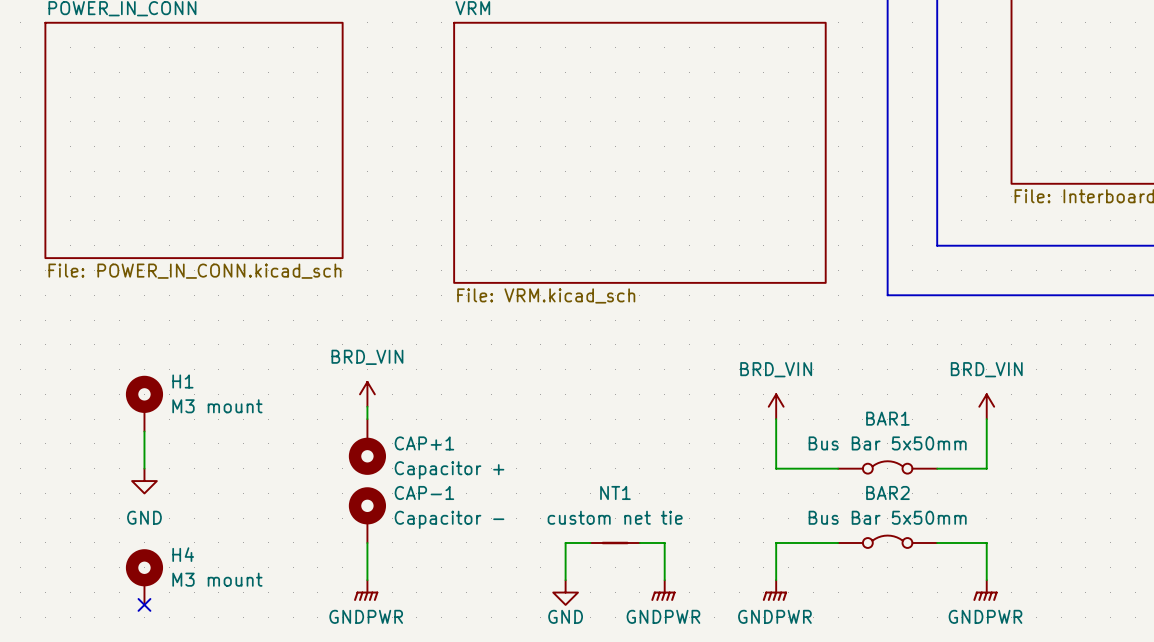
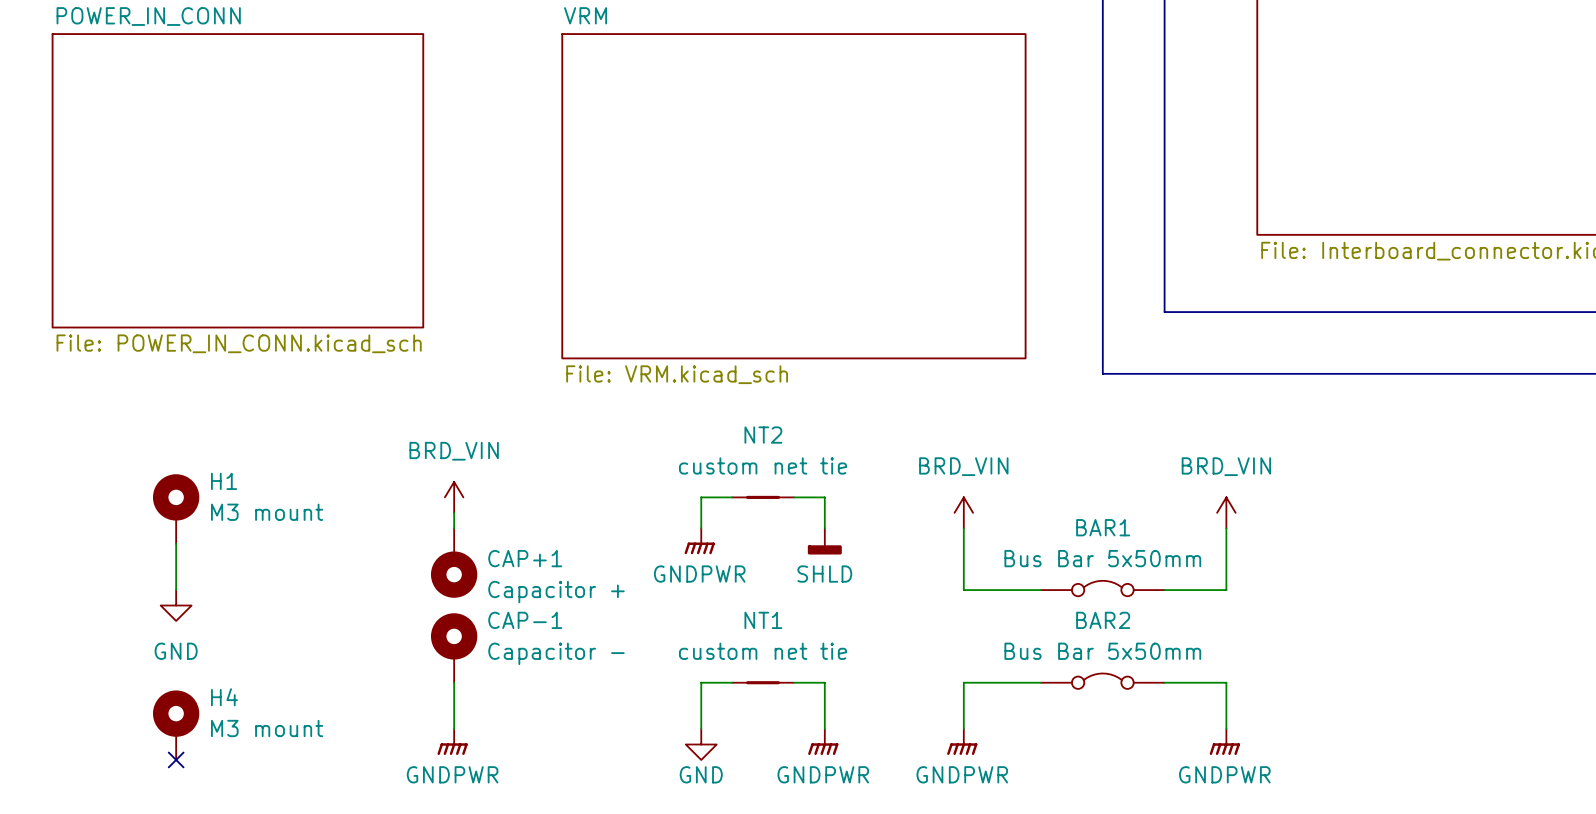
wire: none -> (732, 497) (701, 497) (701, 528)
NT2: none -> custom net tie (763, 497)
wire: none -> (793, 497) (824, 497) (824, 528)
power symbol: none -> GNDPWR (699, 541)
power symbol: none -> SHLD (824, 541)

